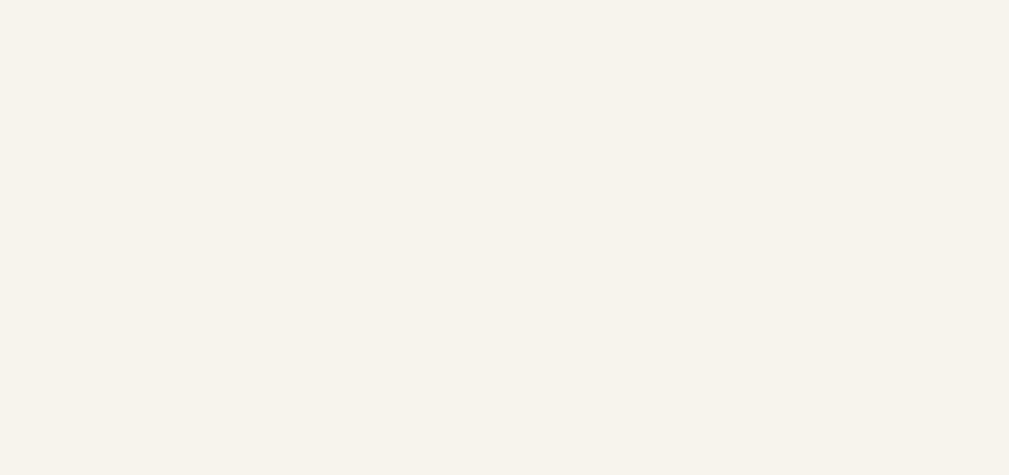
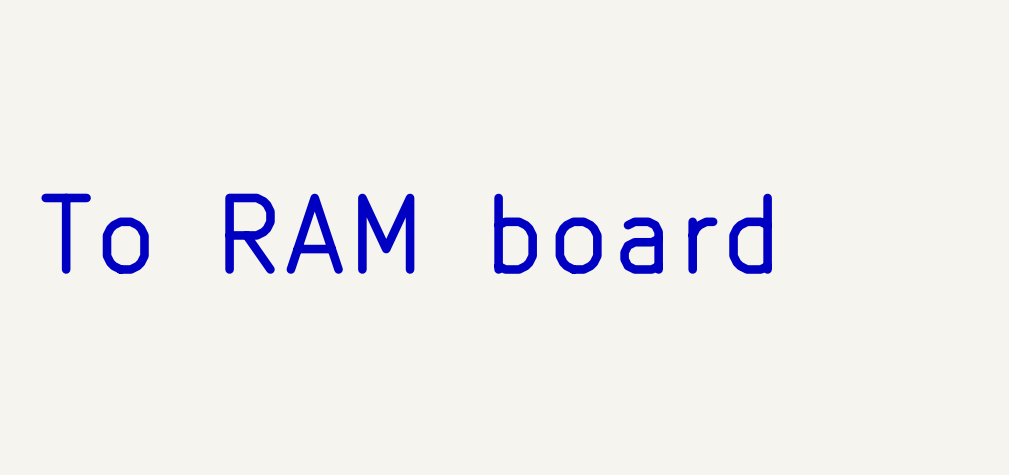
text: none -> To RAM board (406, 233)

